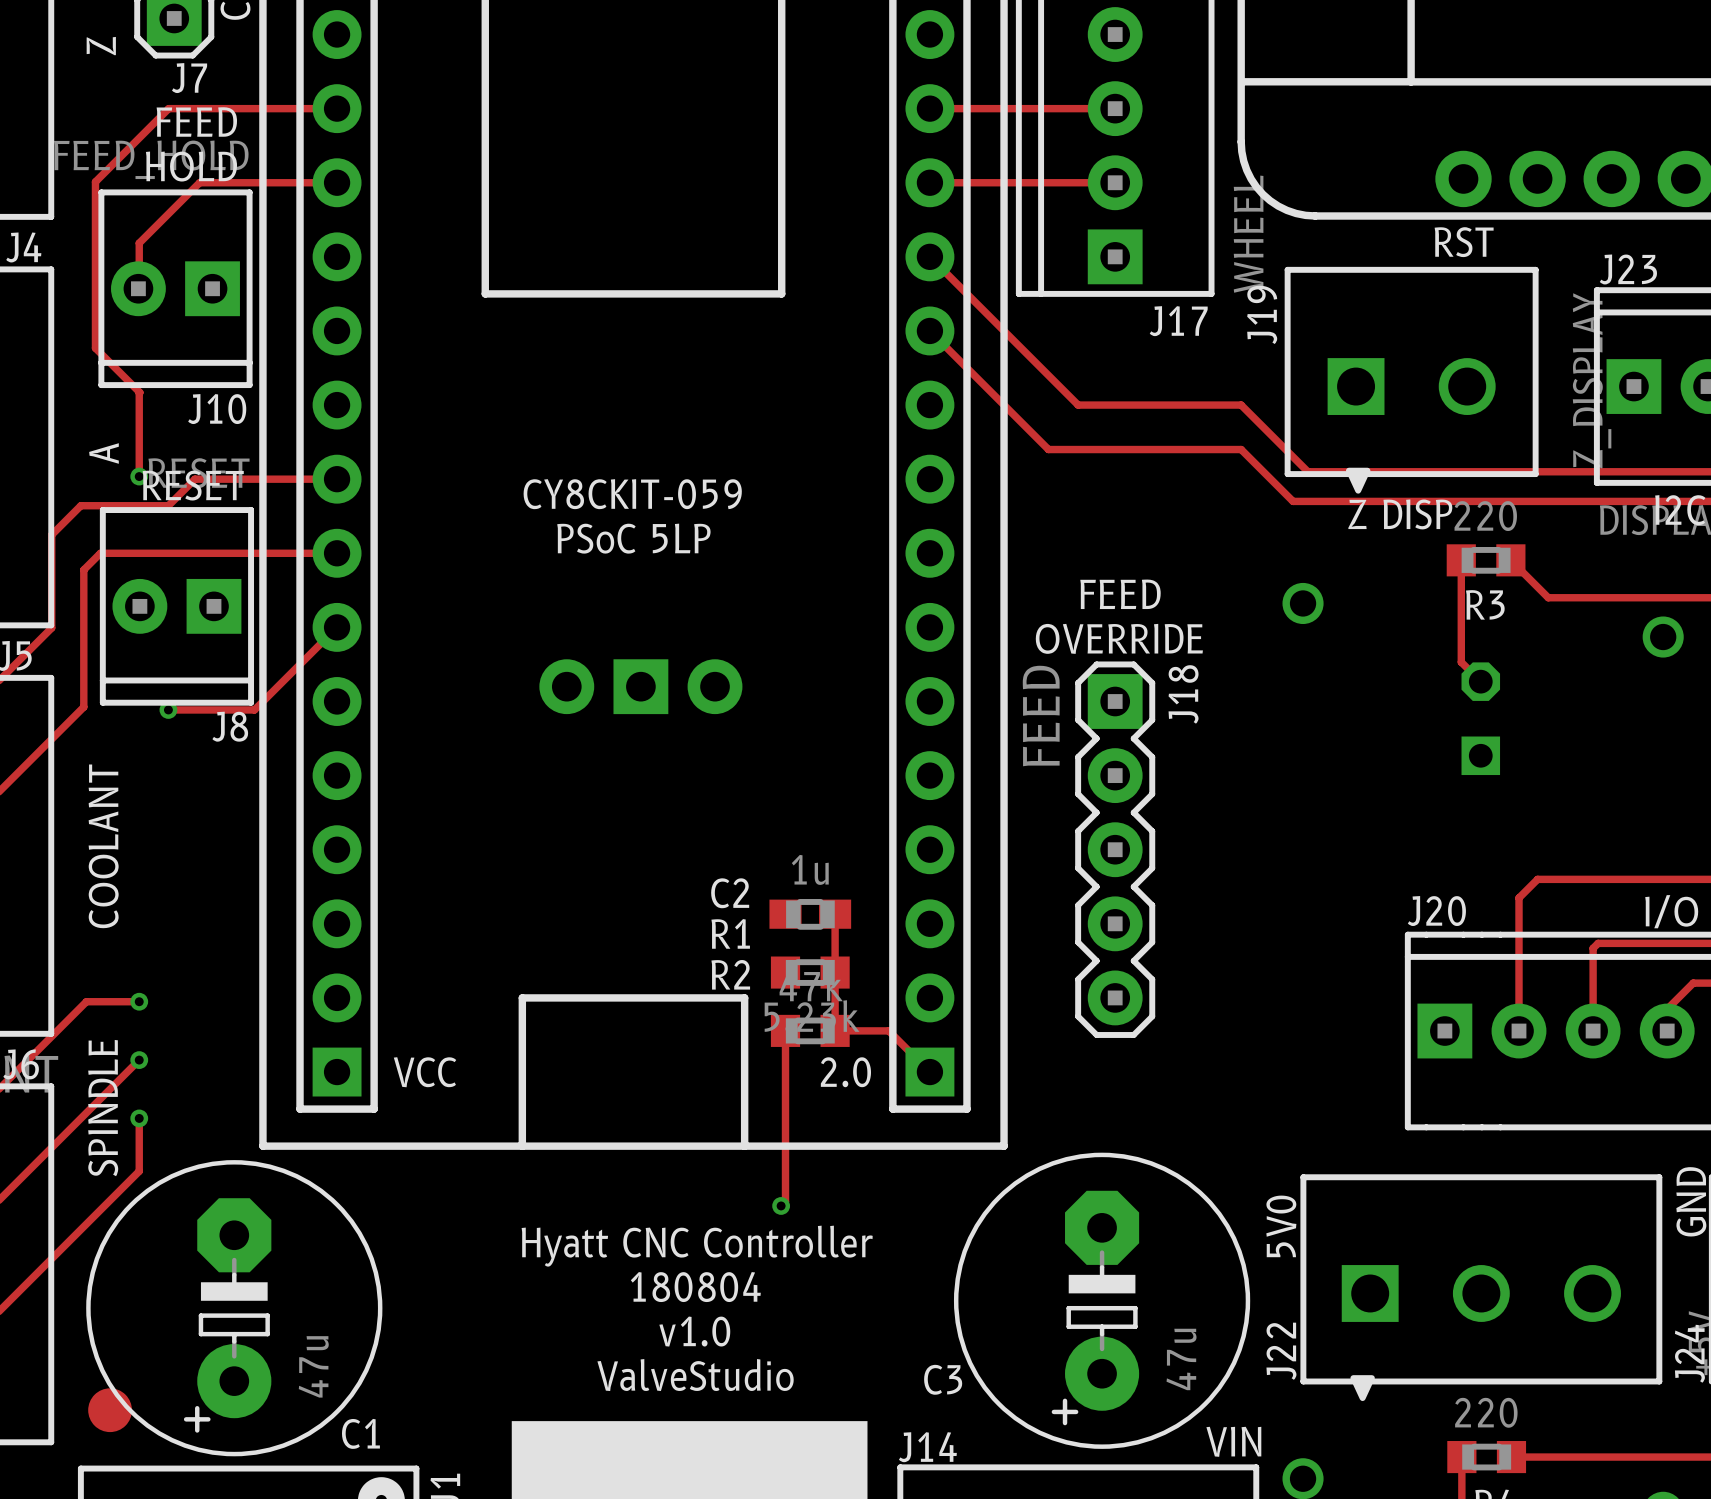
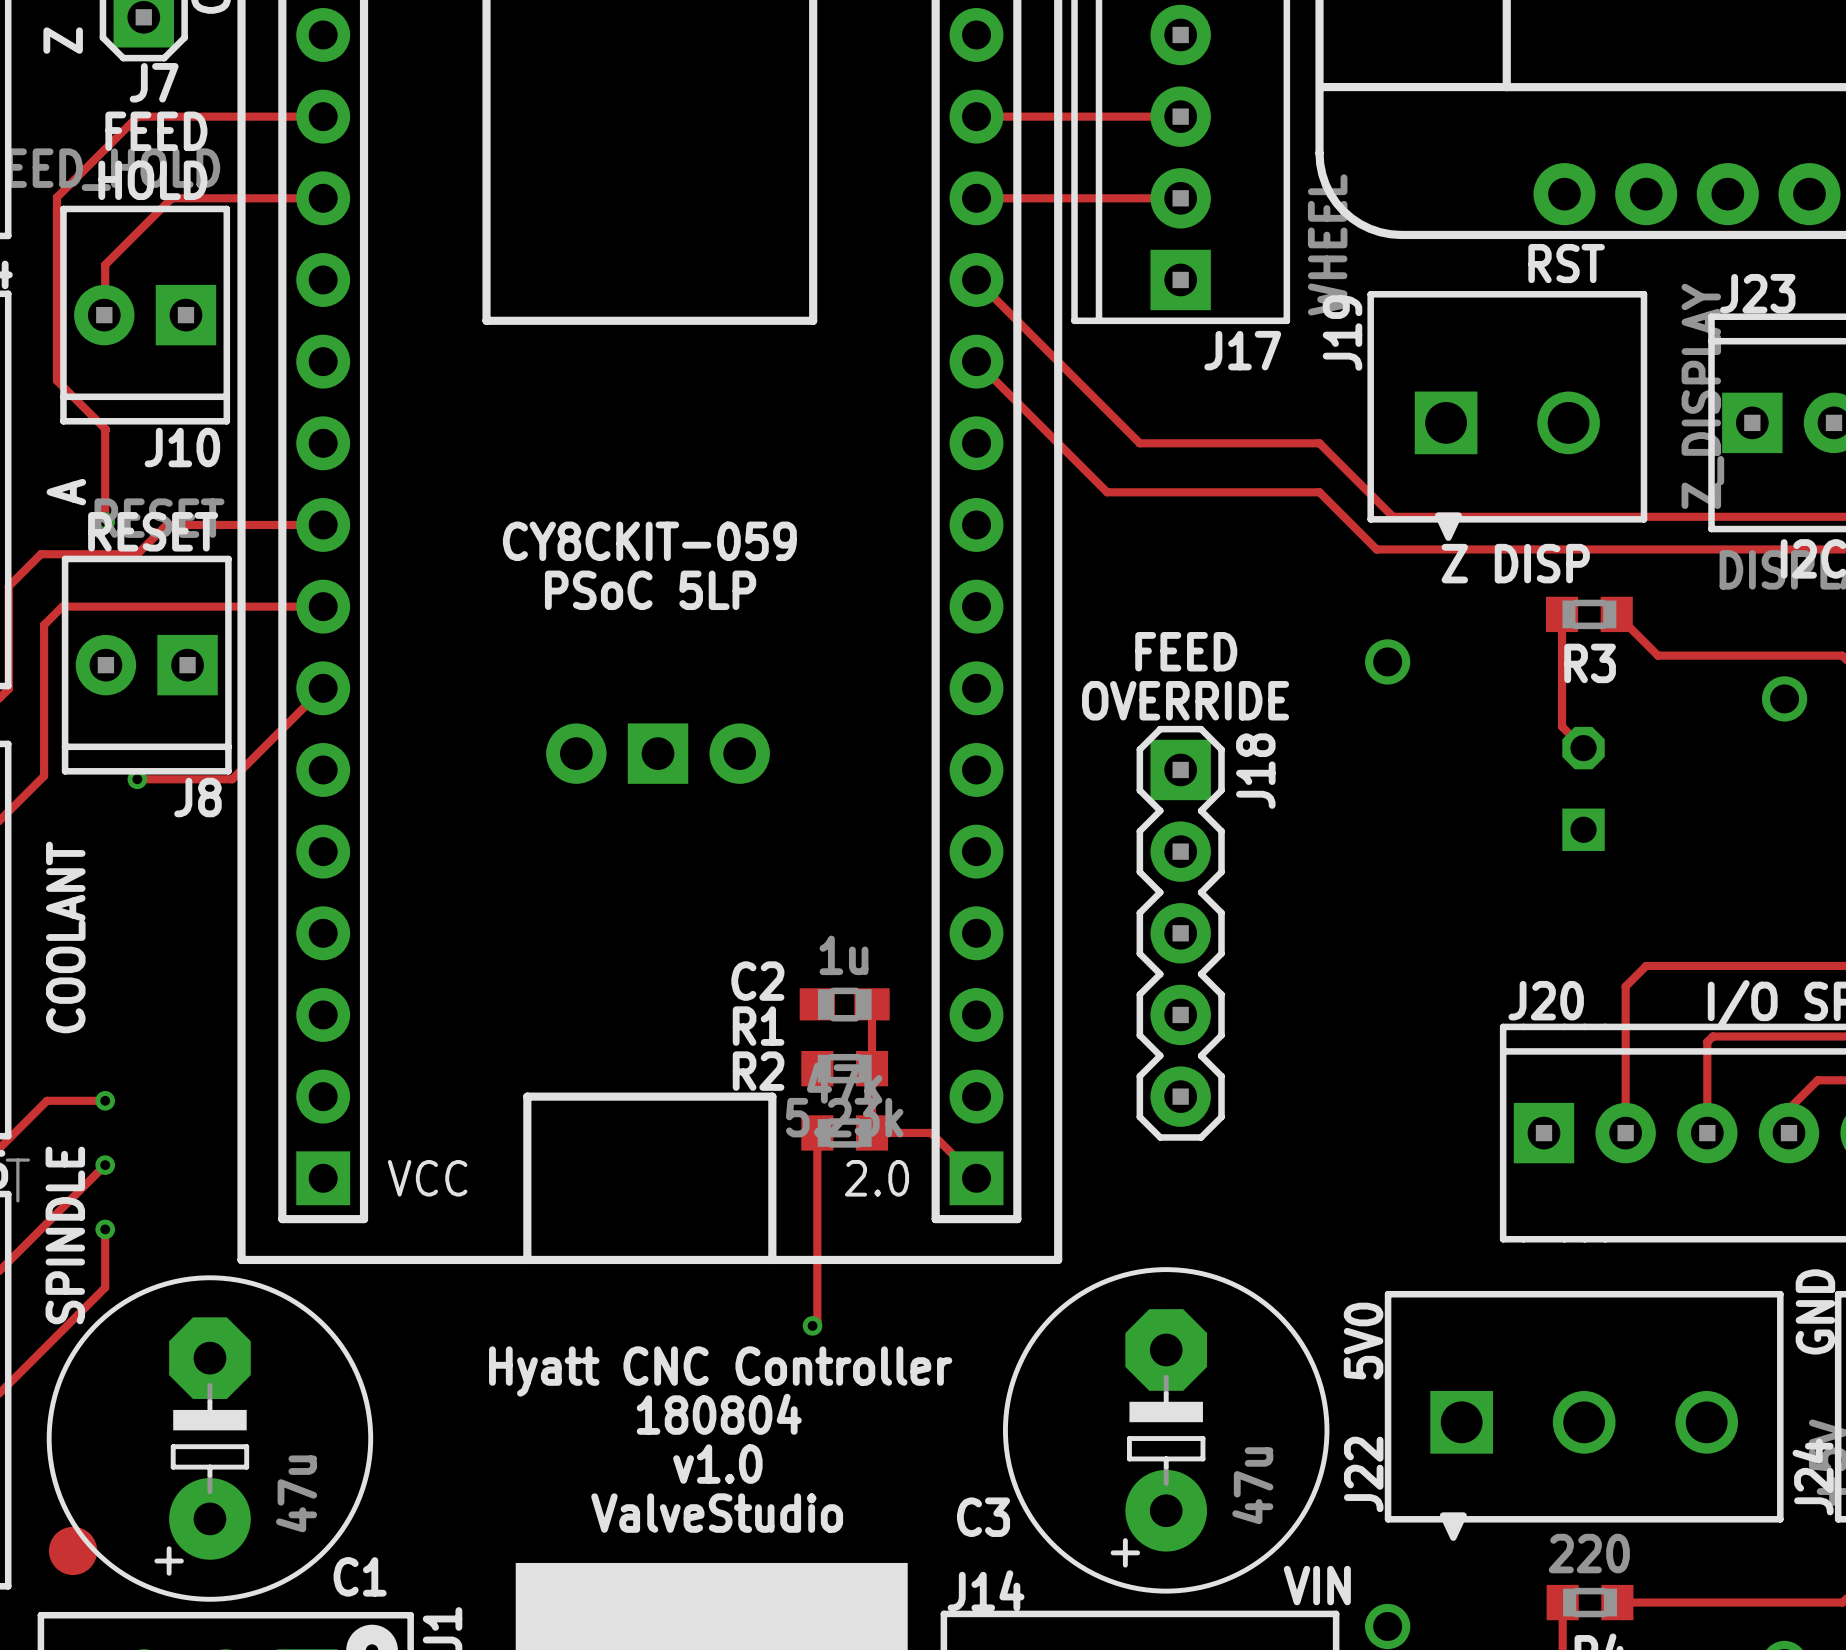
R3 value: 220 (1485, 516) -> none
J18 value: FEED (1041, 716) -> none

